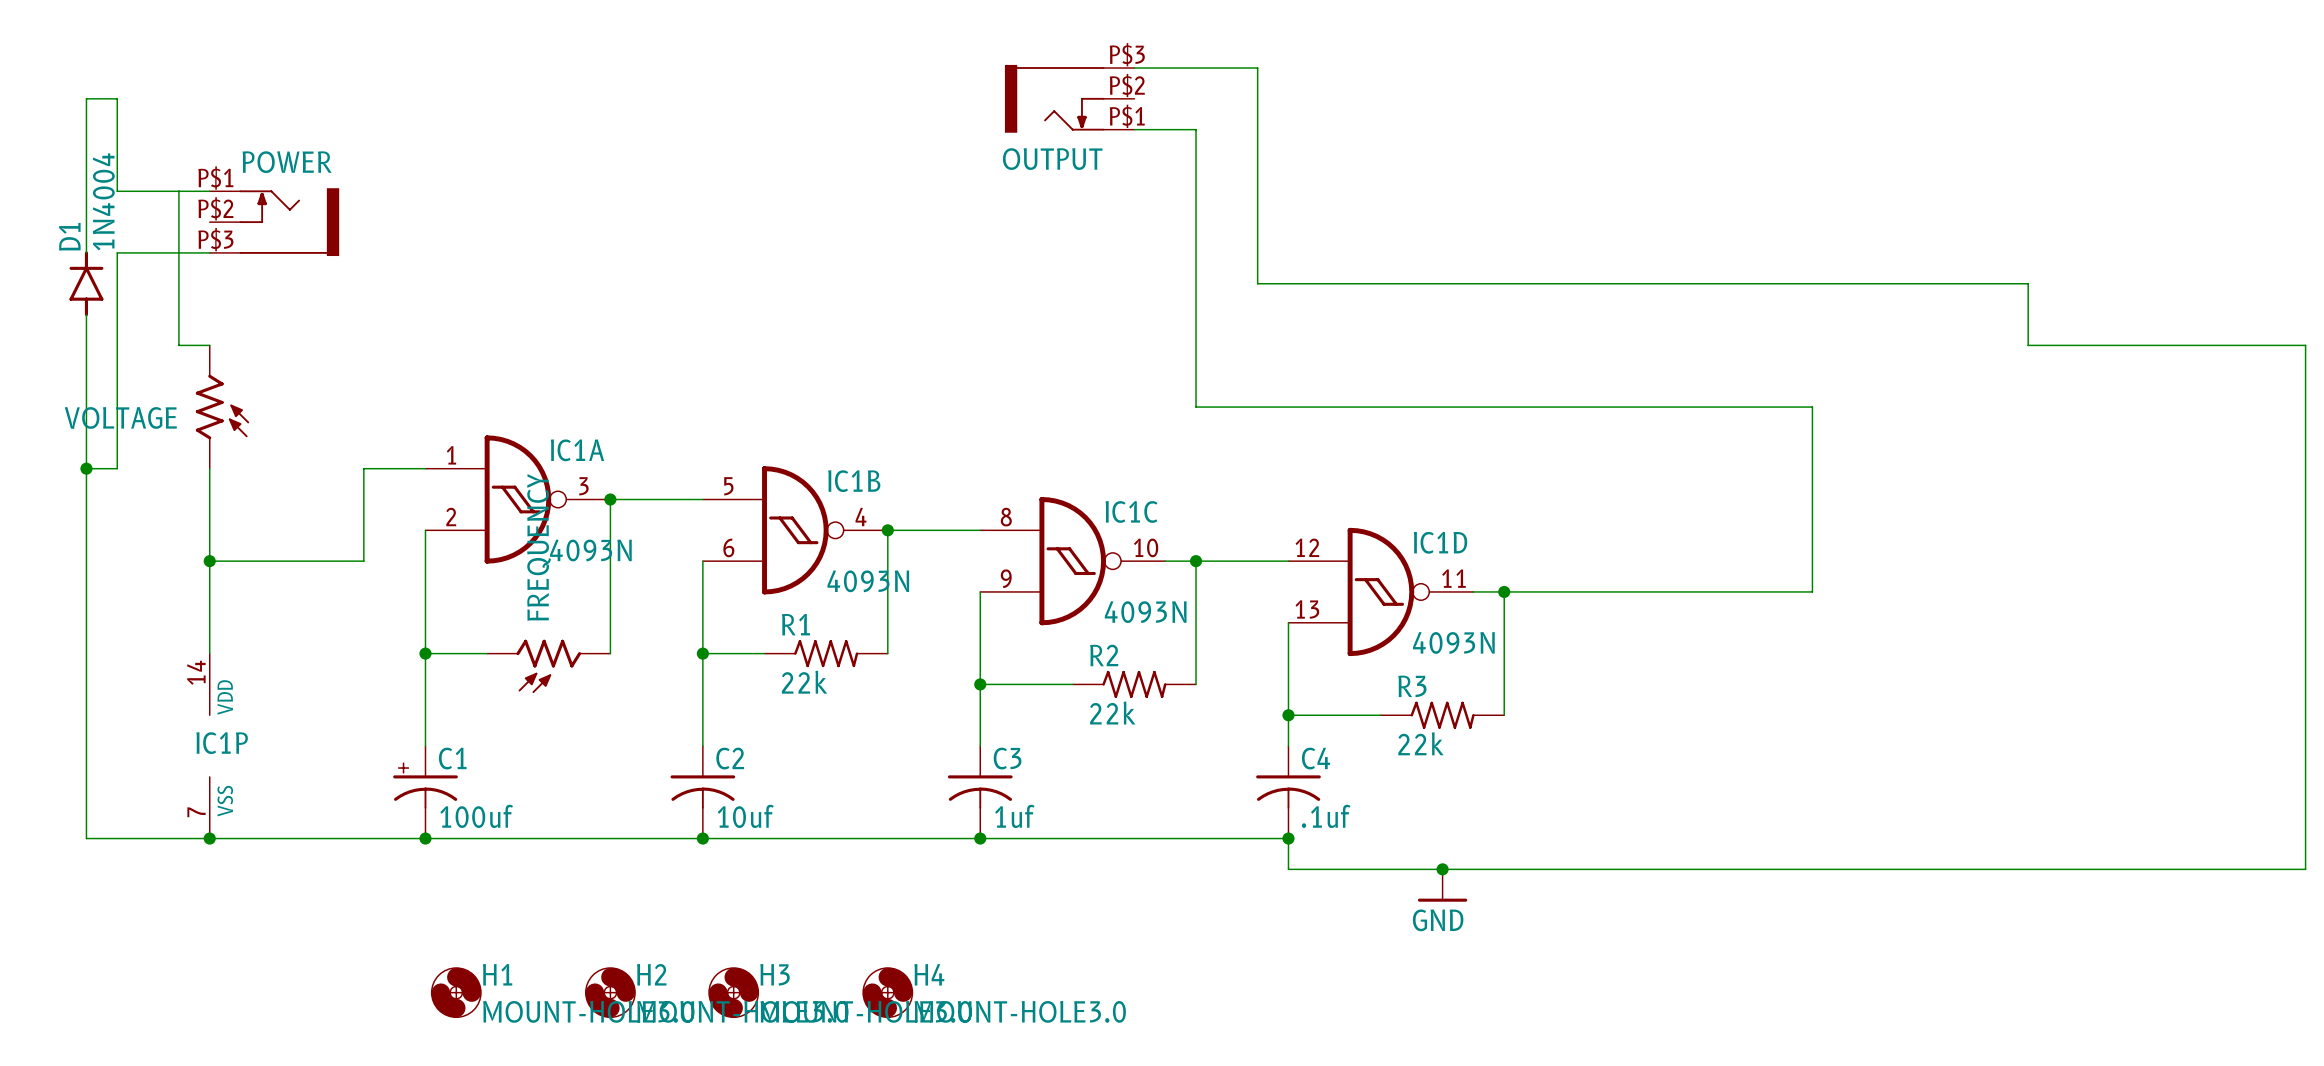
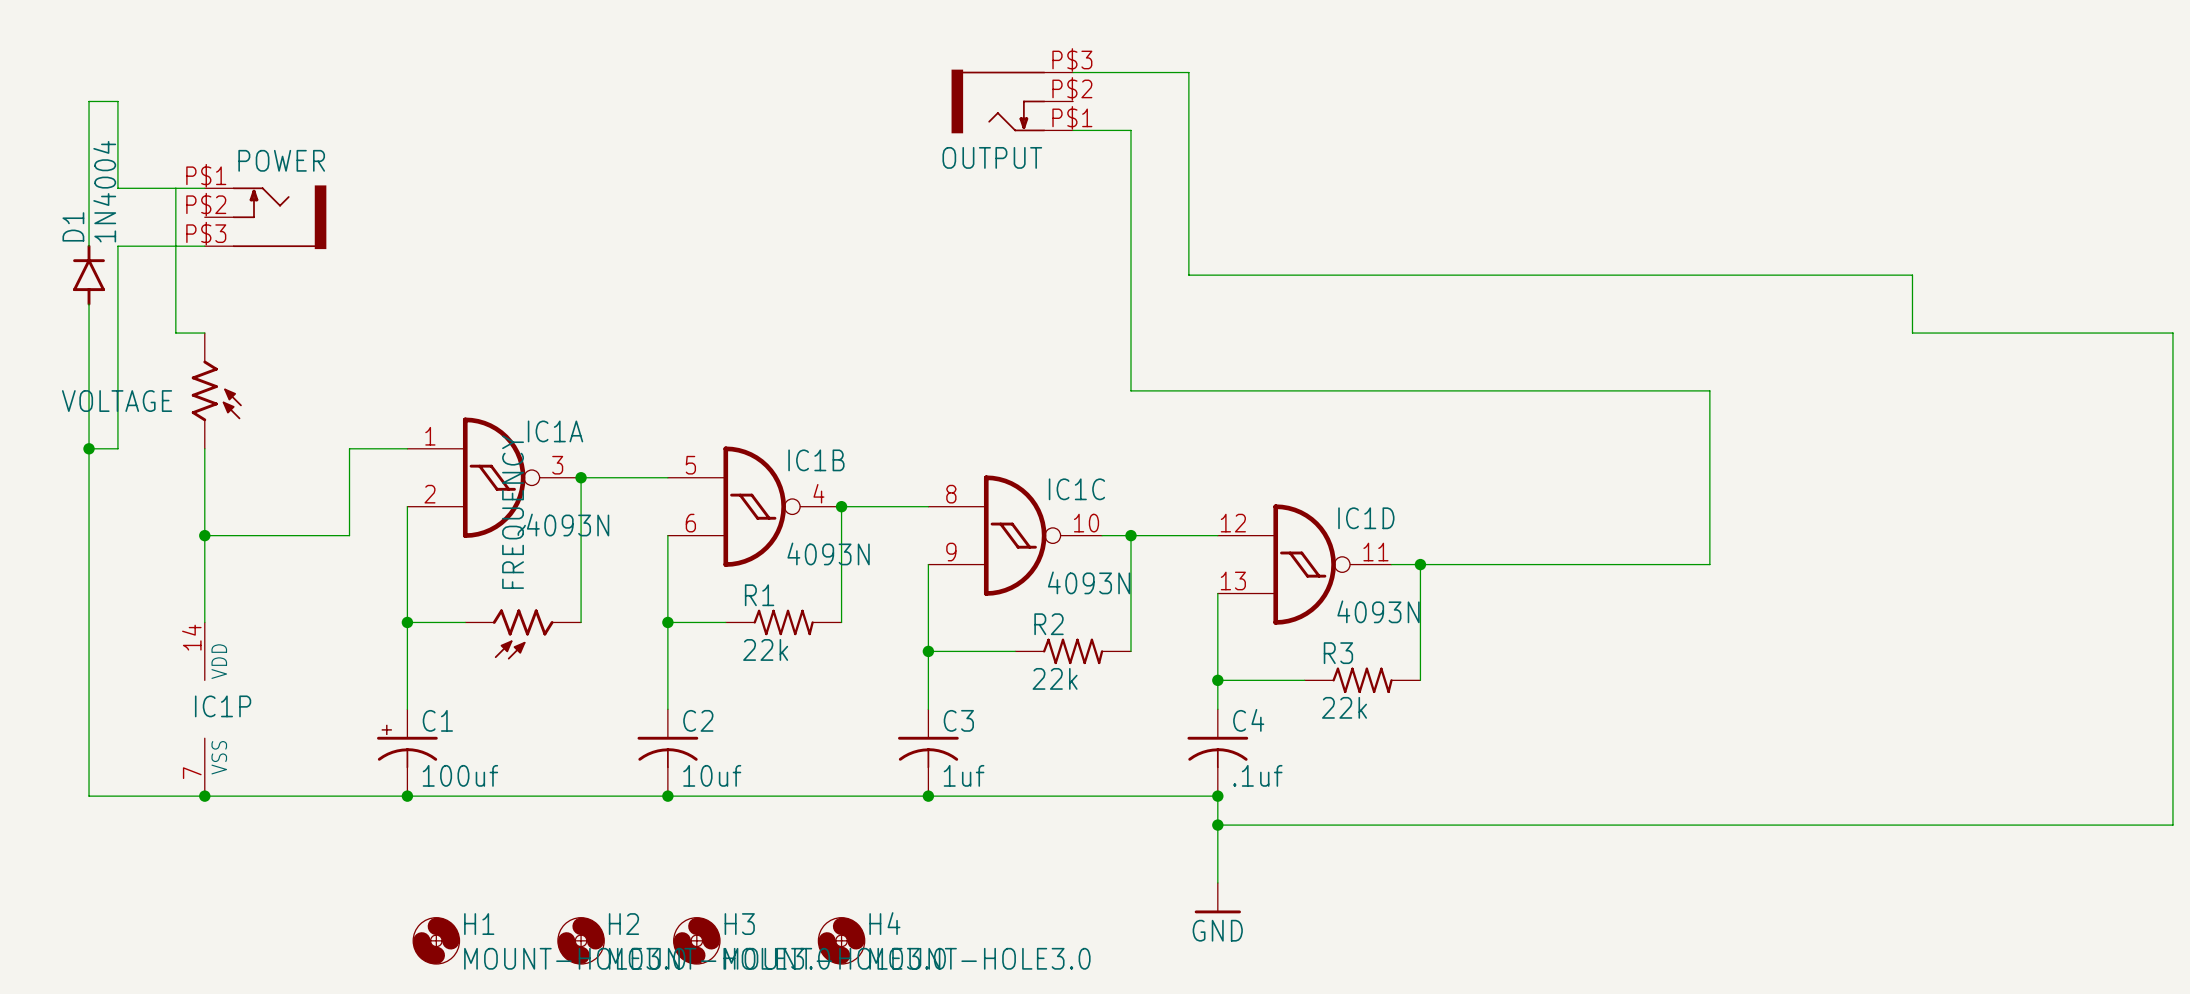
wire: none -> (1217, 825) (1217, 882)
junction: none -> (1217, 825)
junction: (1442, 869) -> none
power symbol position: GND (1442, 885) -> GND (1217, 898)

